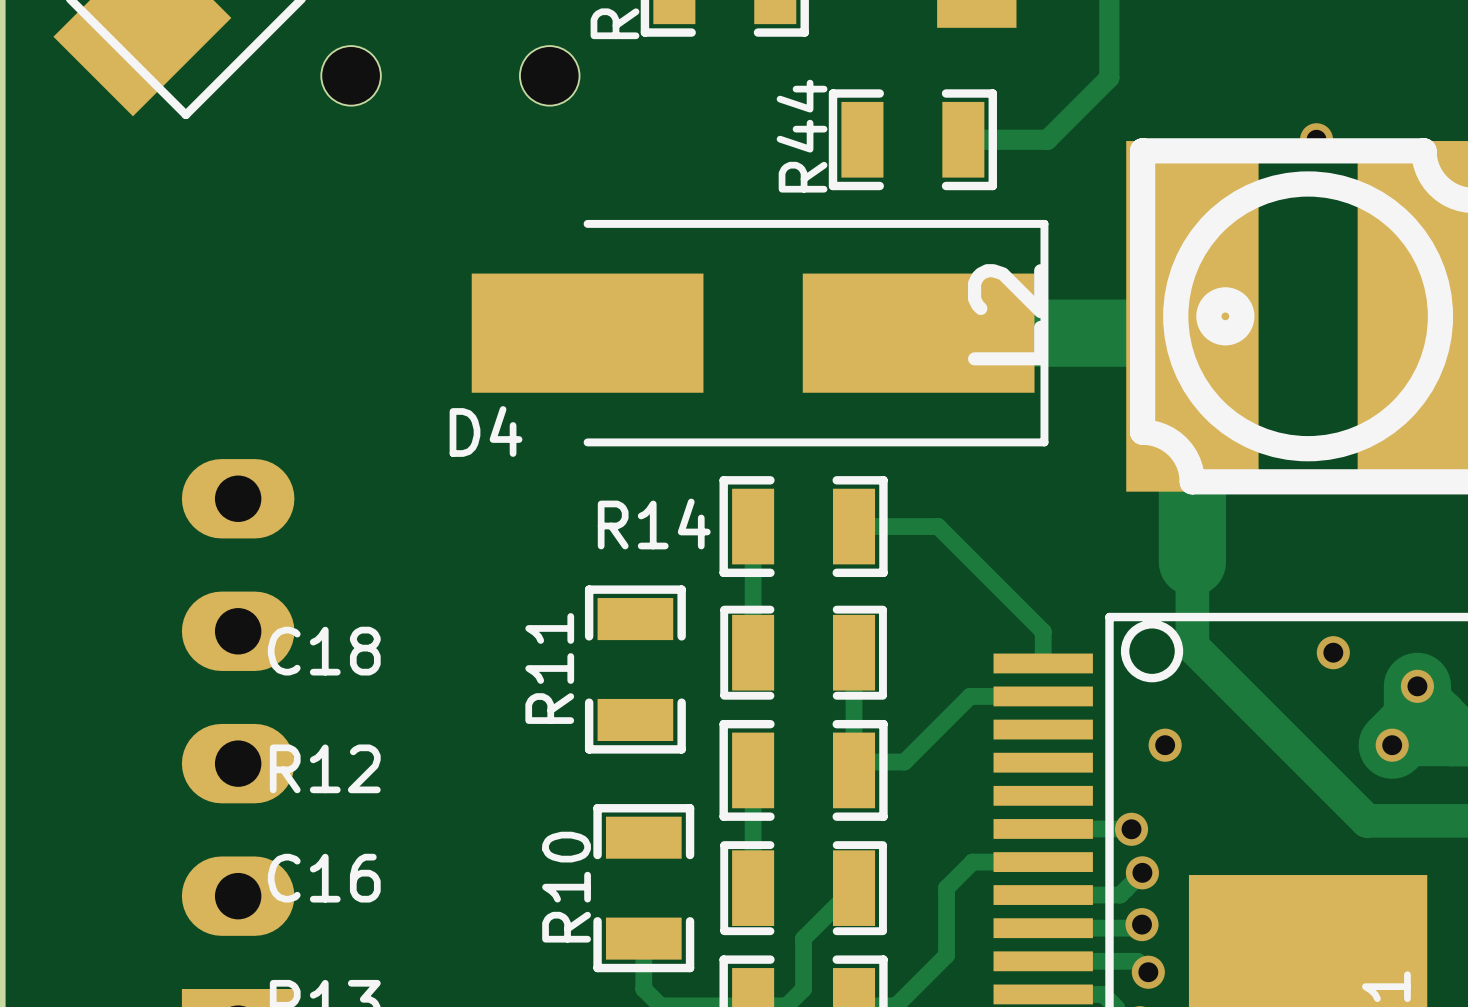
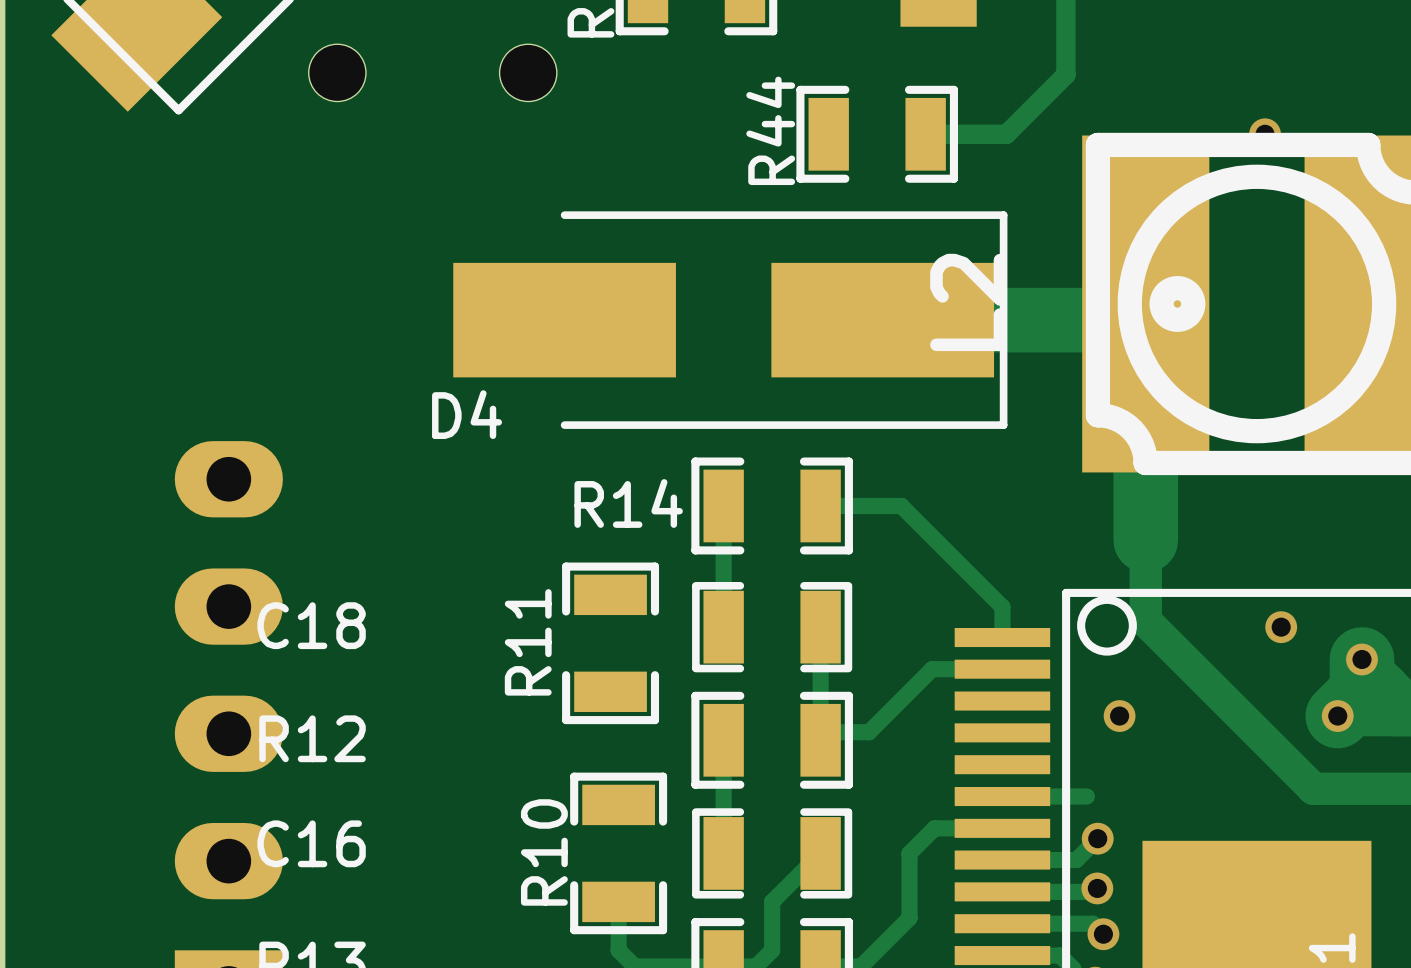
via: (1131, 829) -> none

